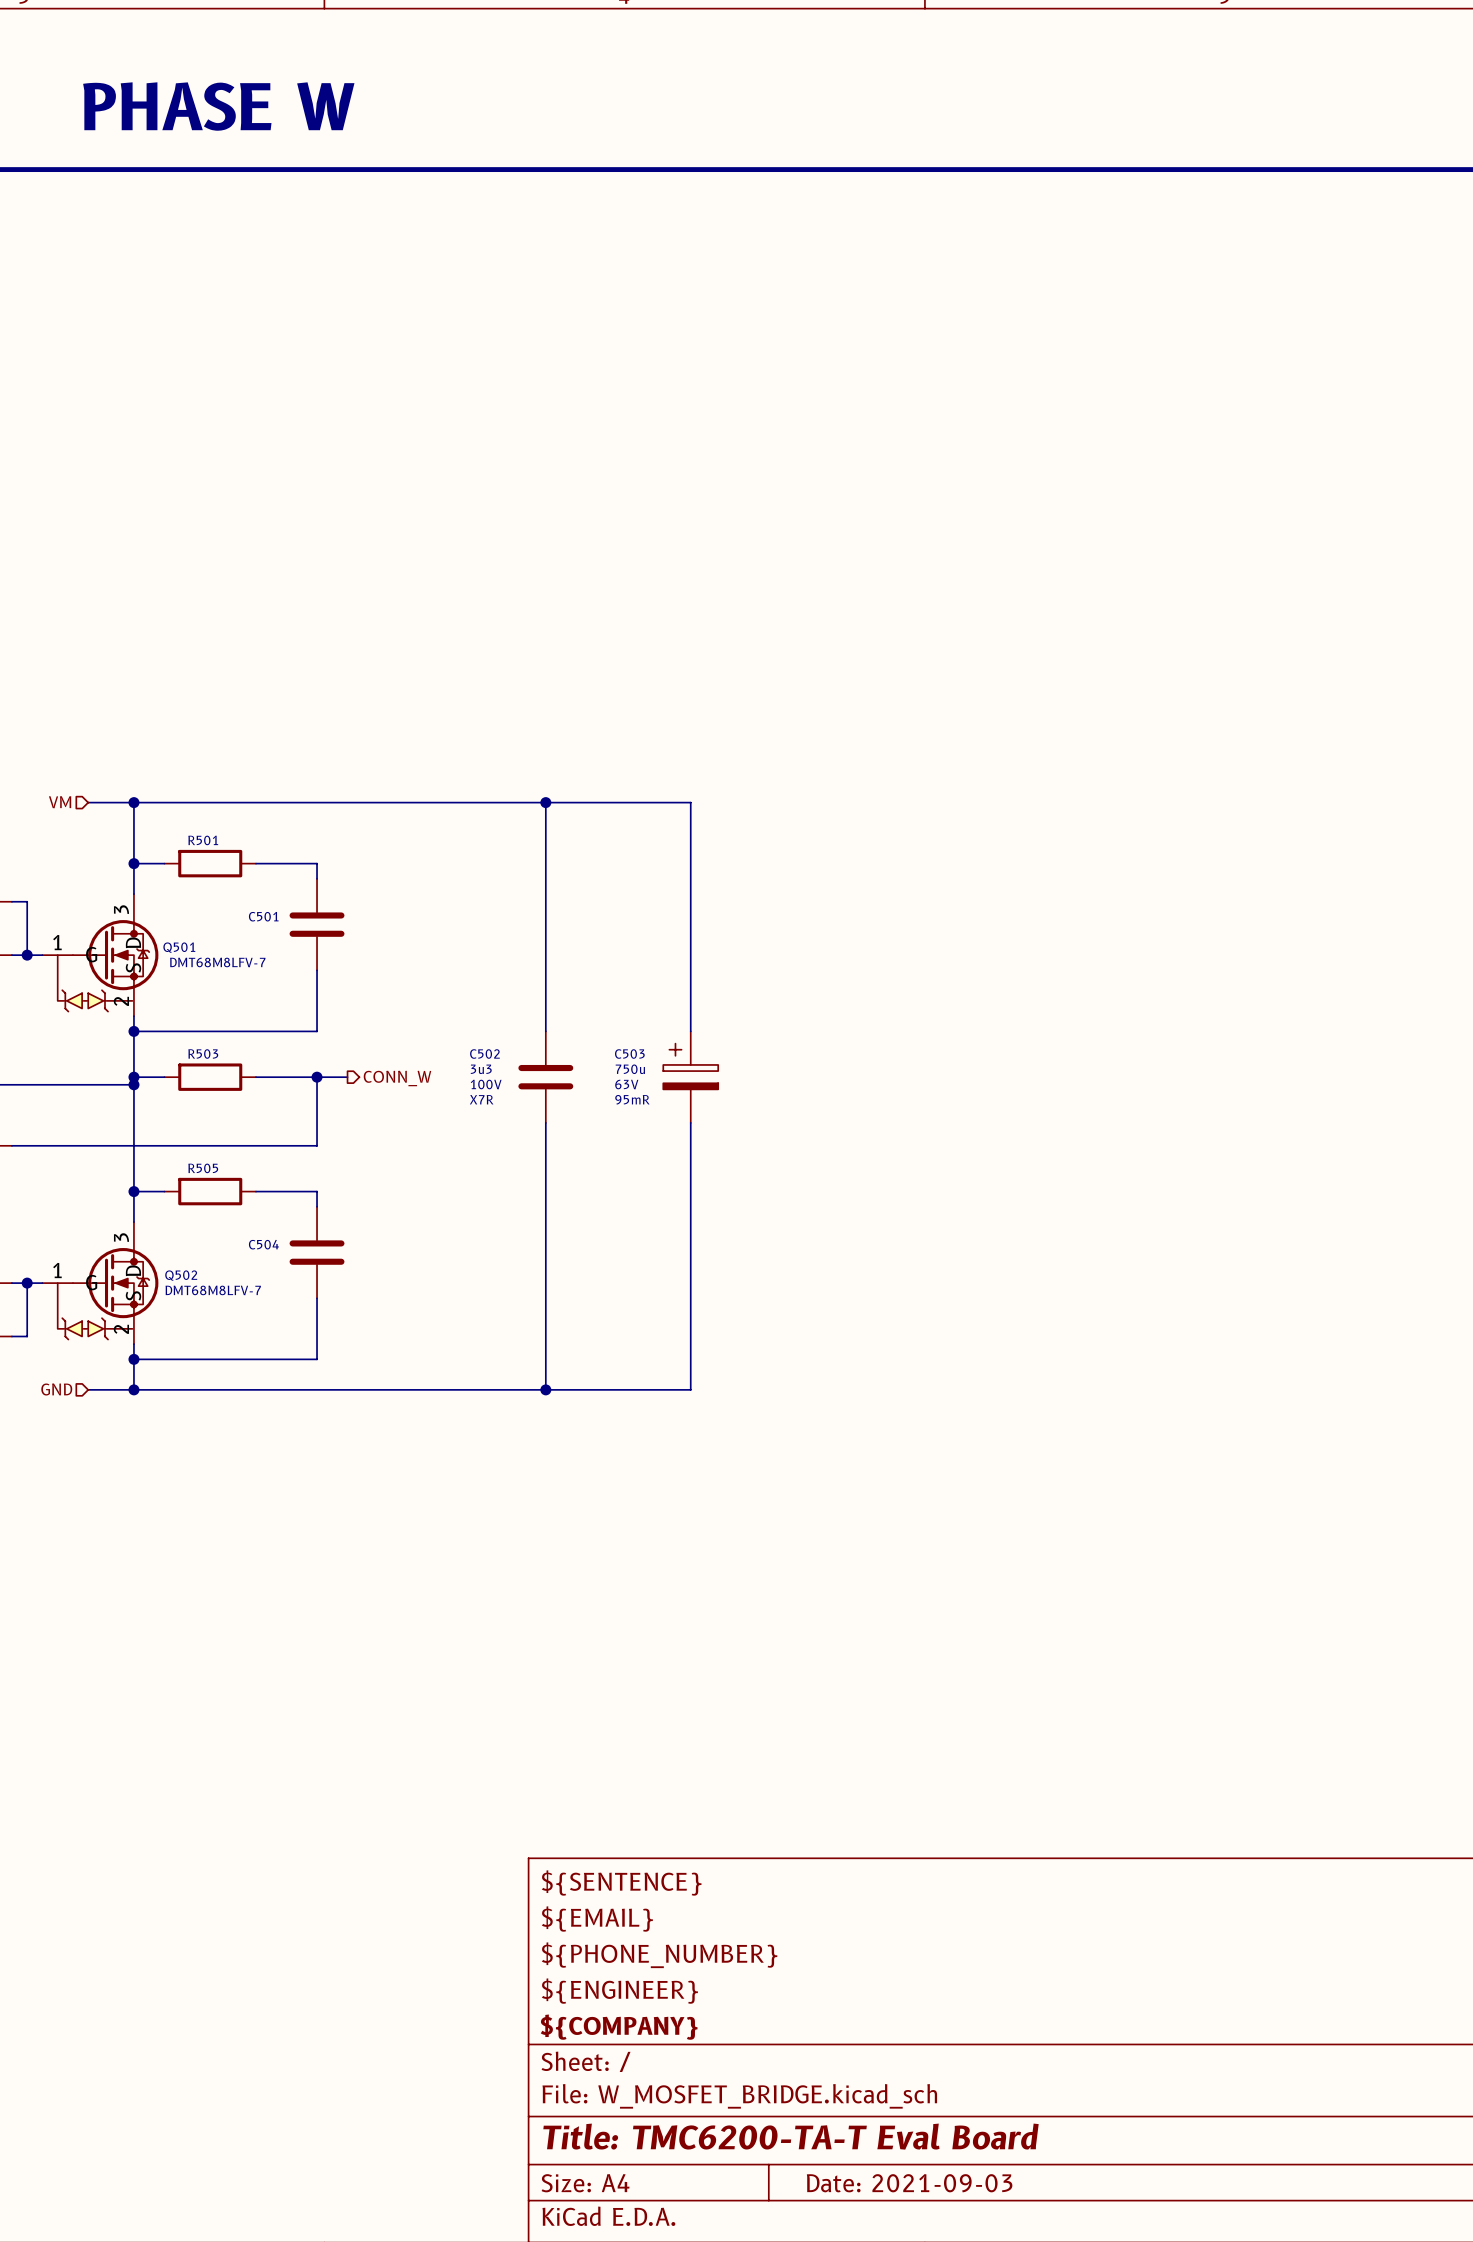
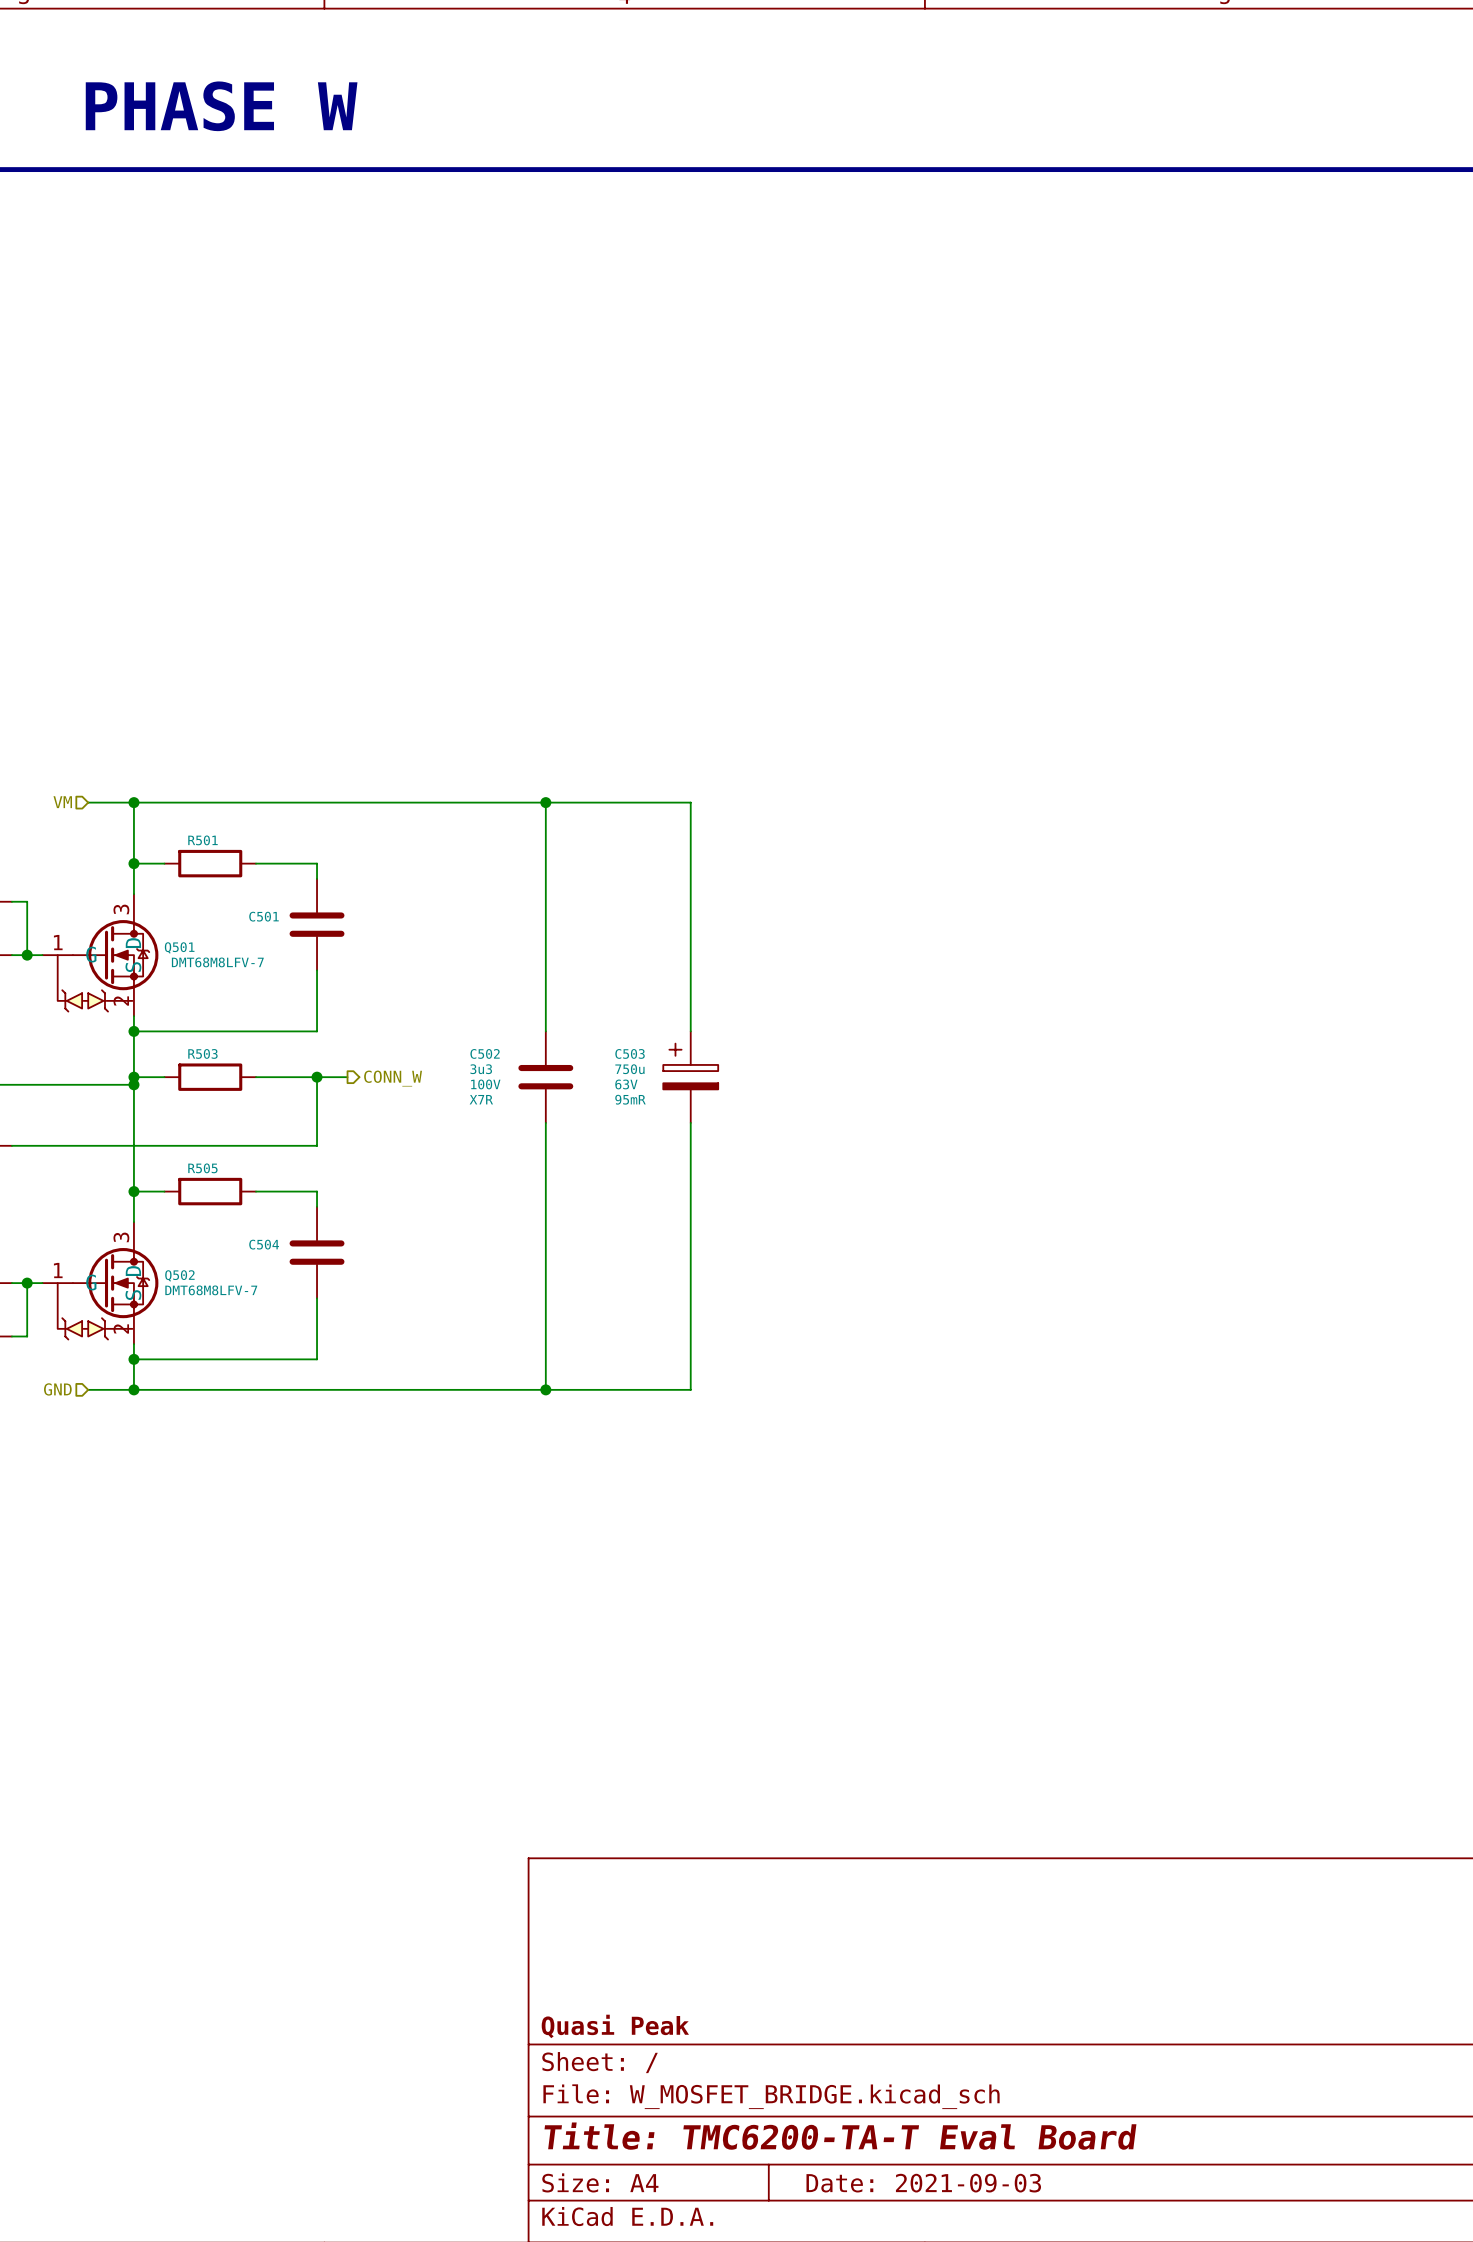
title block: ${SENTENCE} (621, 1882) -> none
title block: ${EMAIL} (597, 1918) -> none
title block: ${PHONE_NUMBER} (659, 1955) -> none
title block: ${ENGINEER} (619, 1991) -> none
title block: ${COMPANY} (619, 2027) -> Quasi Peak (615, 2026)

